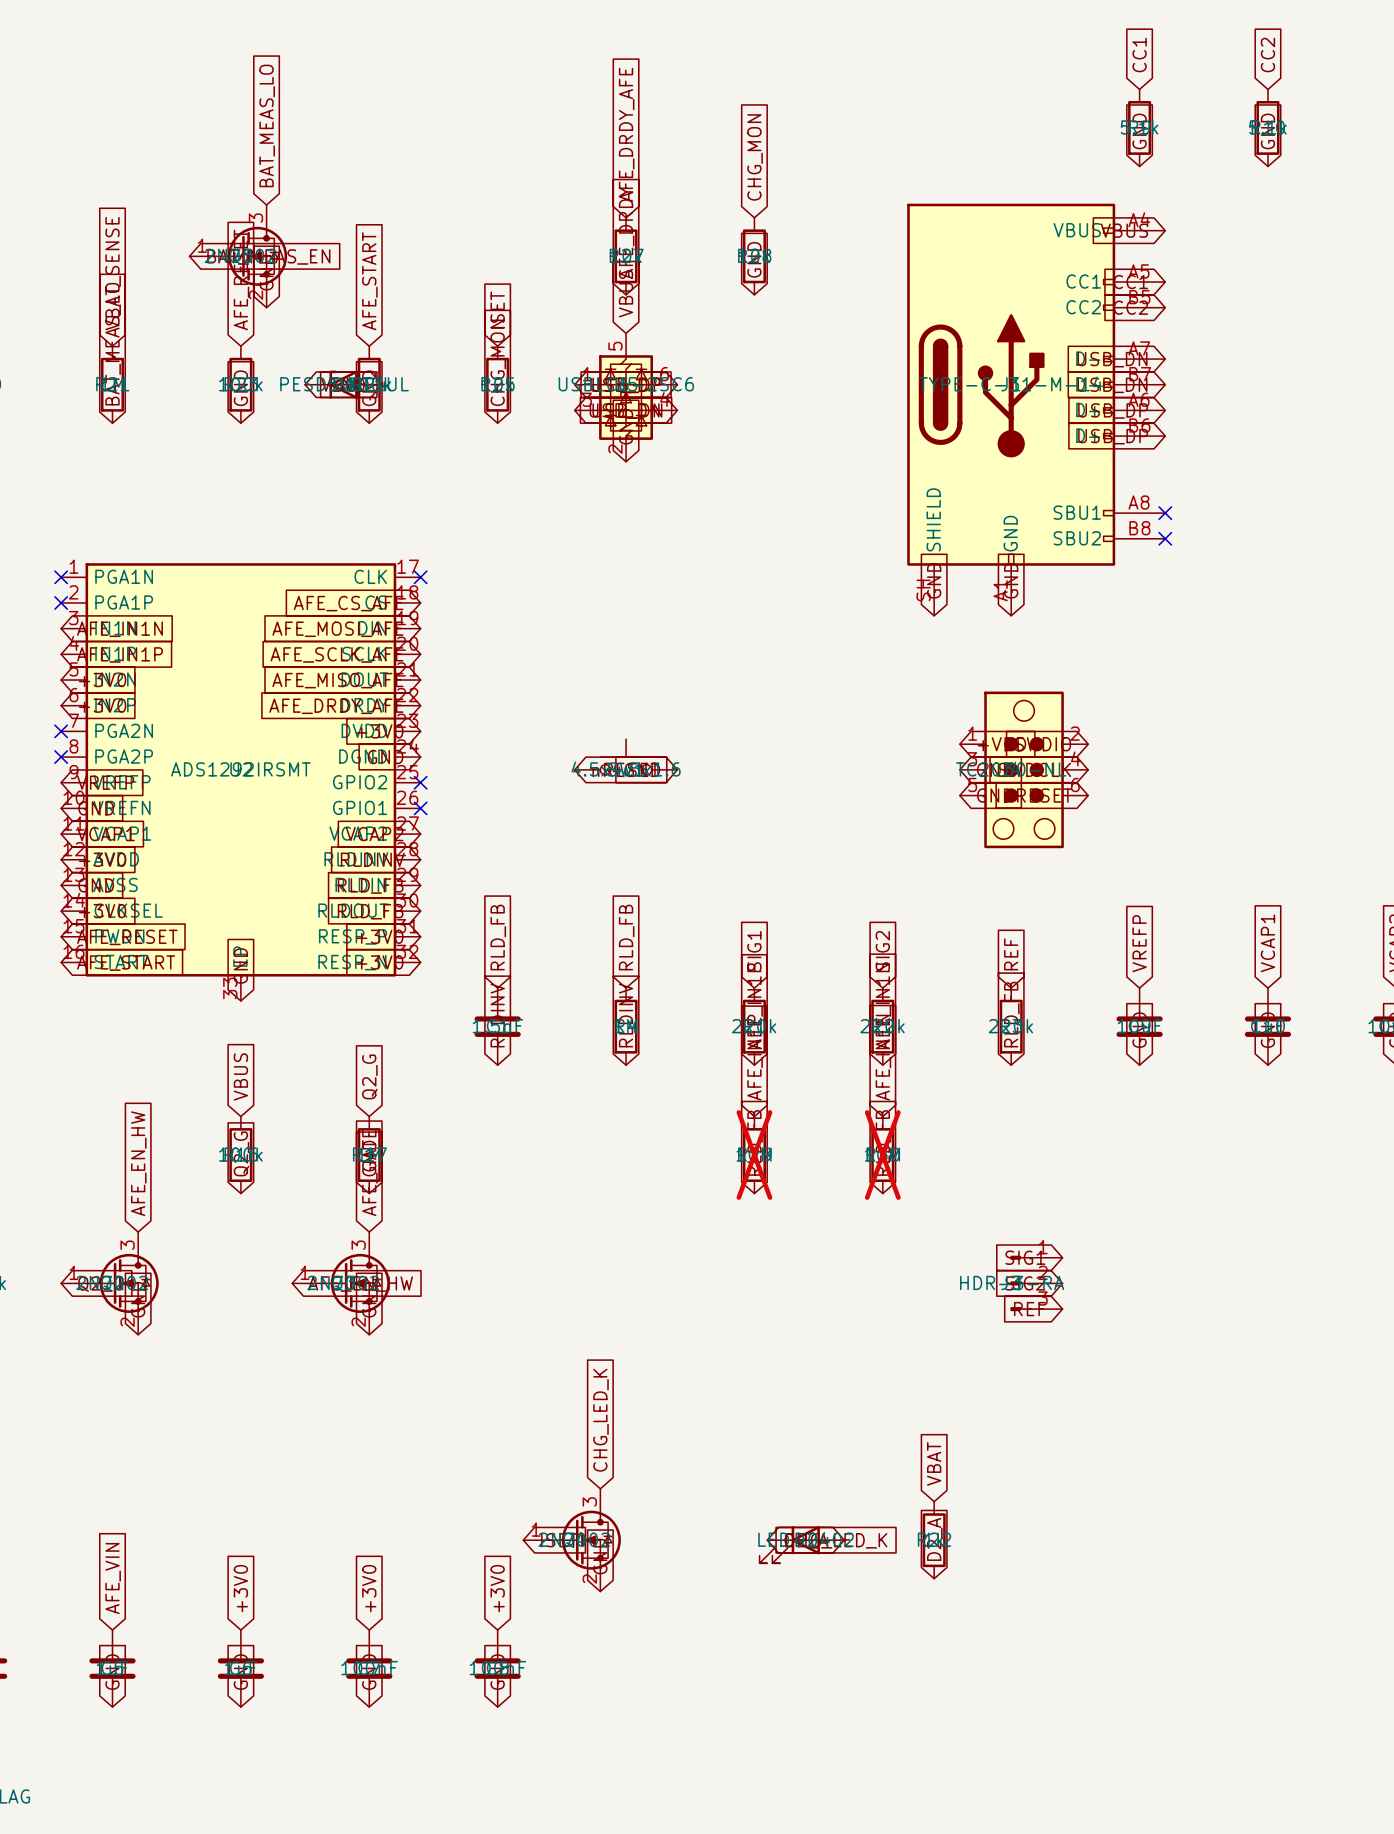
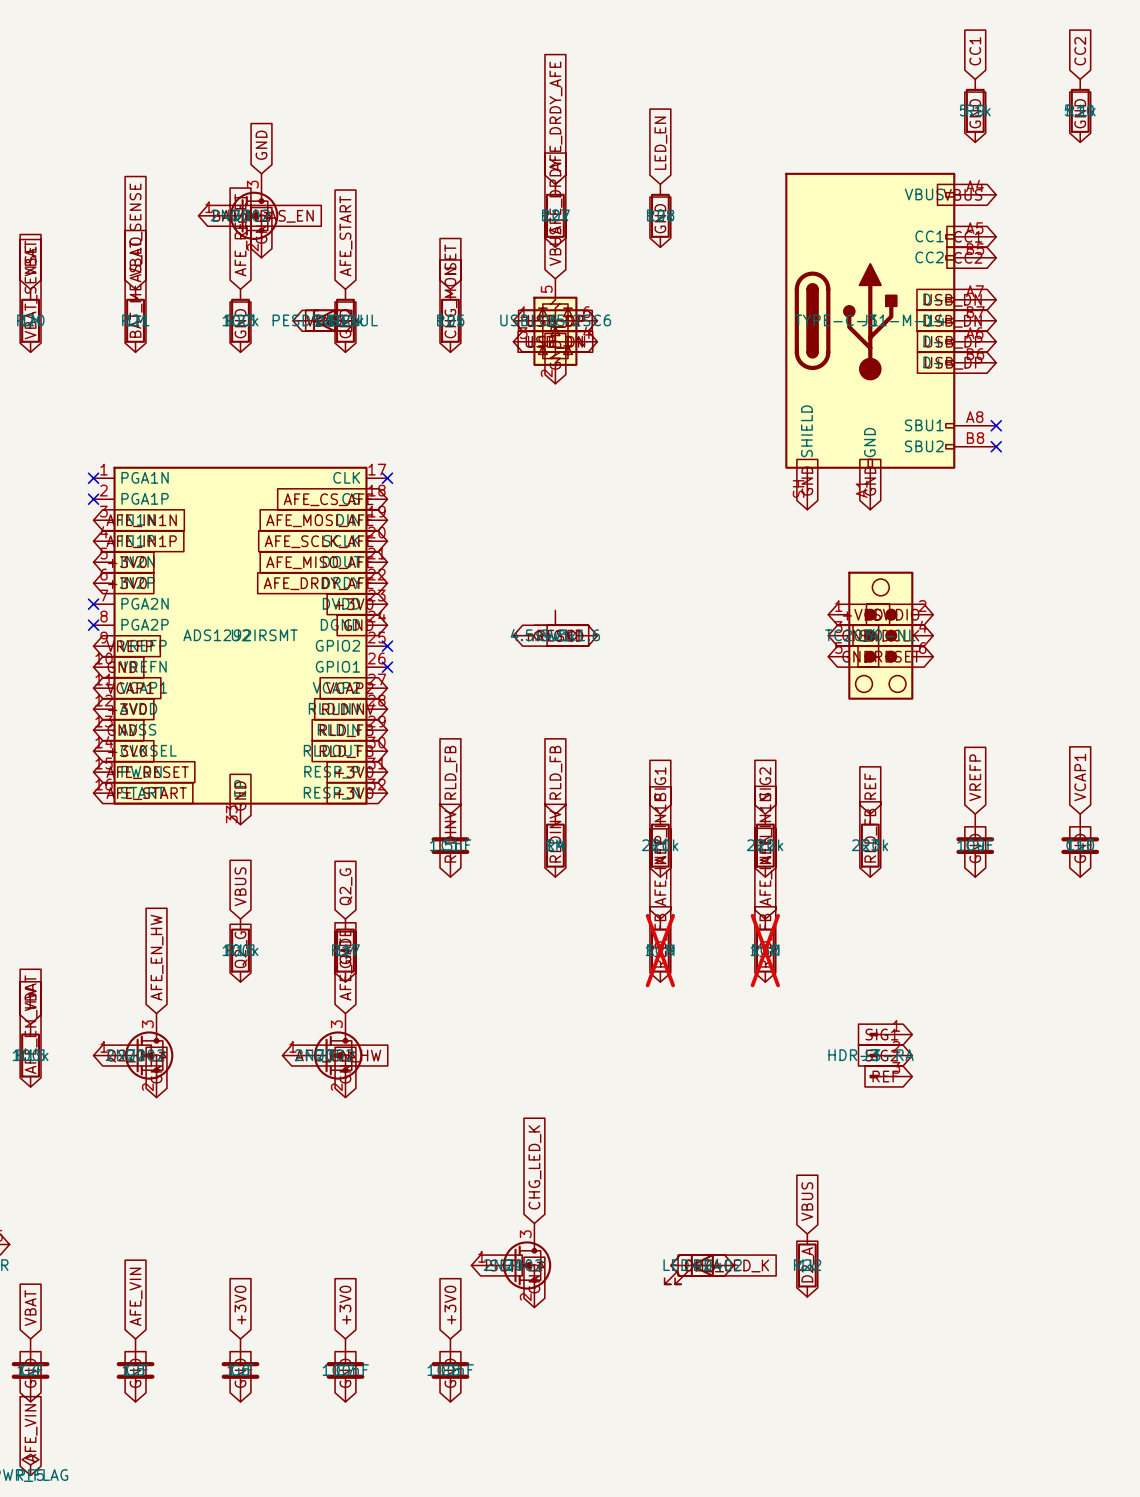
global label: BAT_MEAS_LO (267, 125) -> GND (261, 145)
global label: CHG_MON (755, 157) -> LED_EN (660, 143)
global label: VBAT (934, 1463) -> VBUS (807, 1201)

